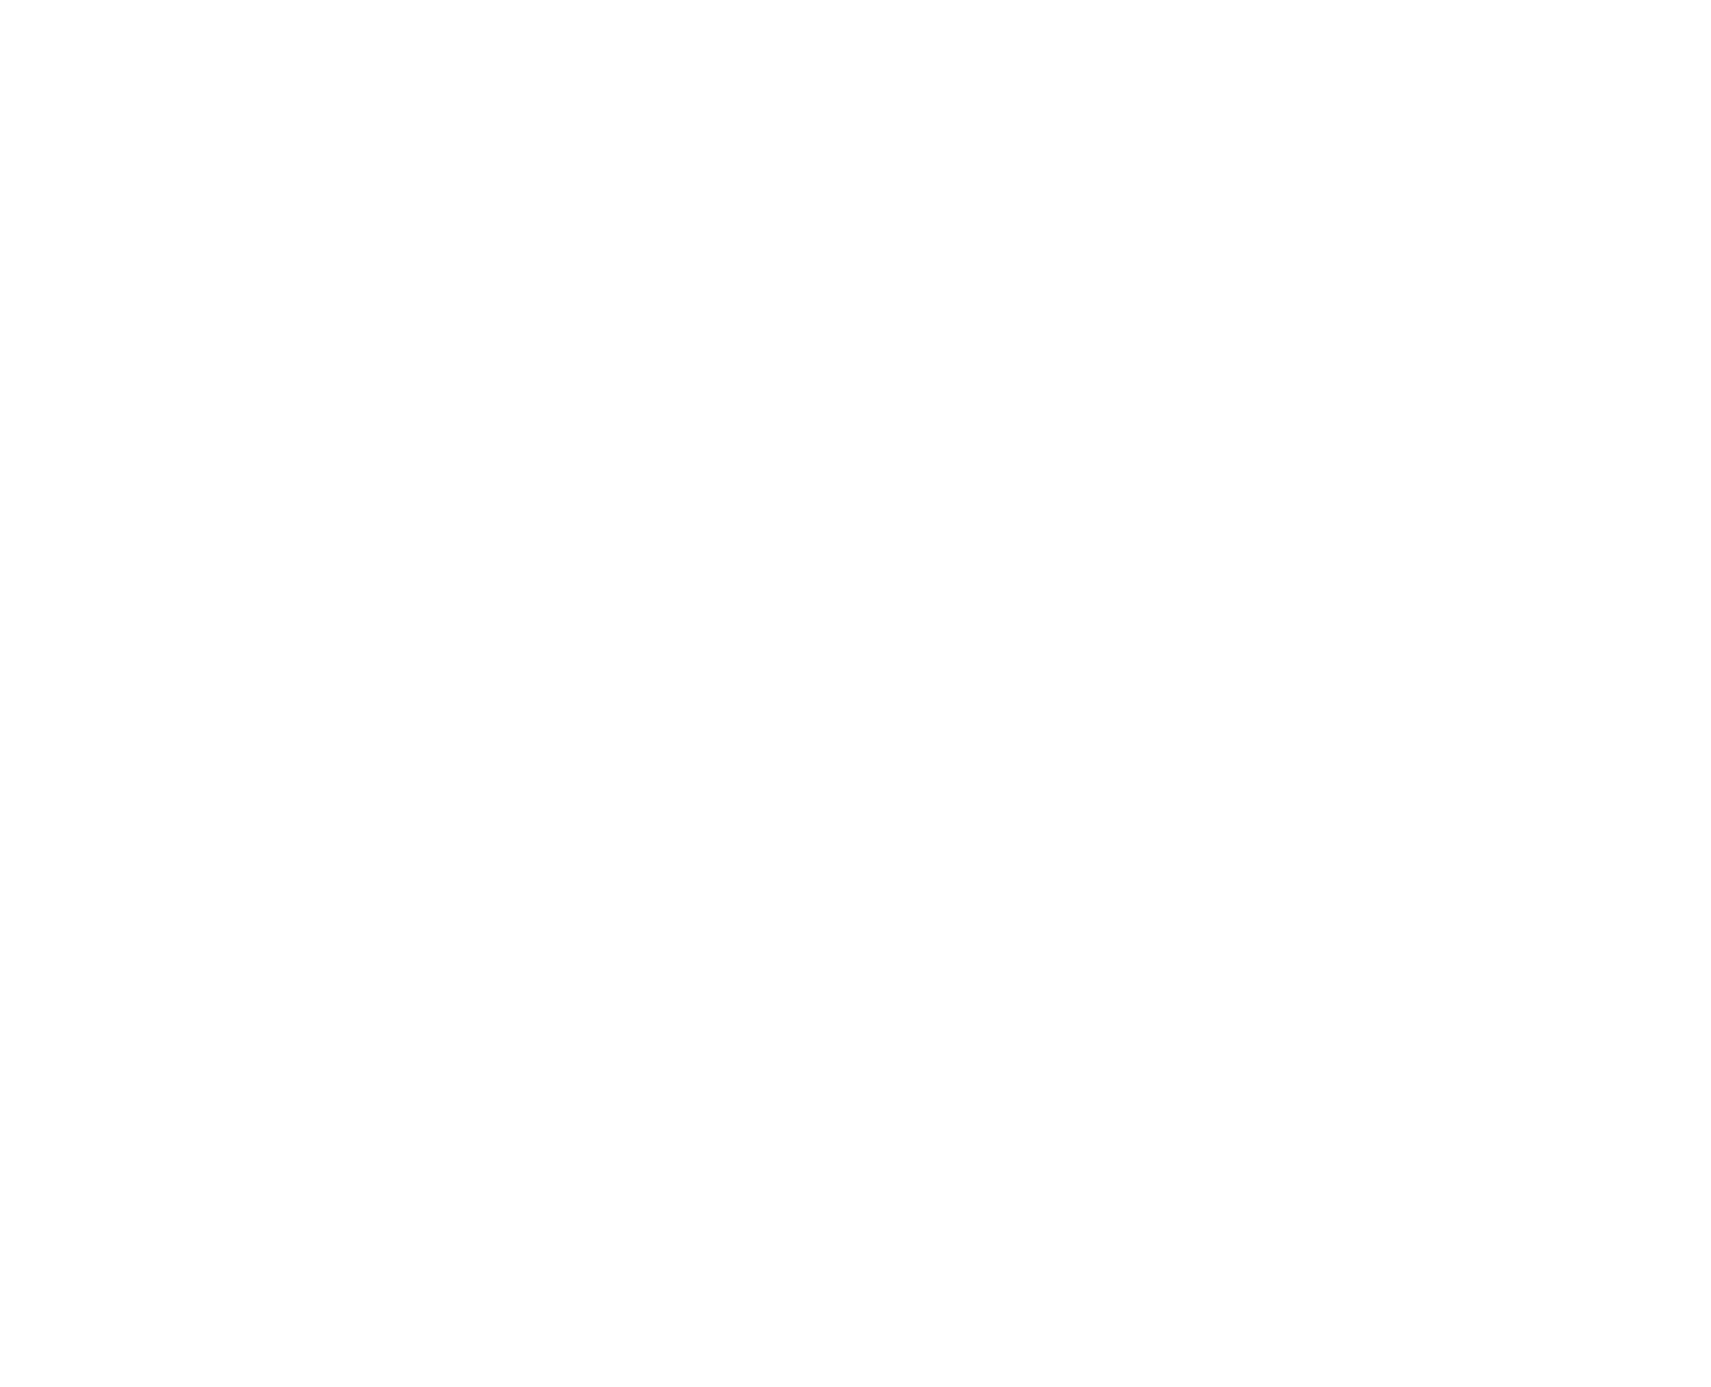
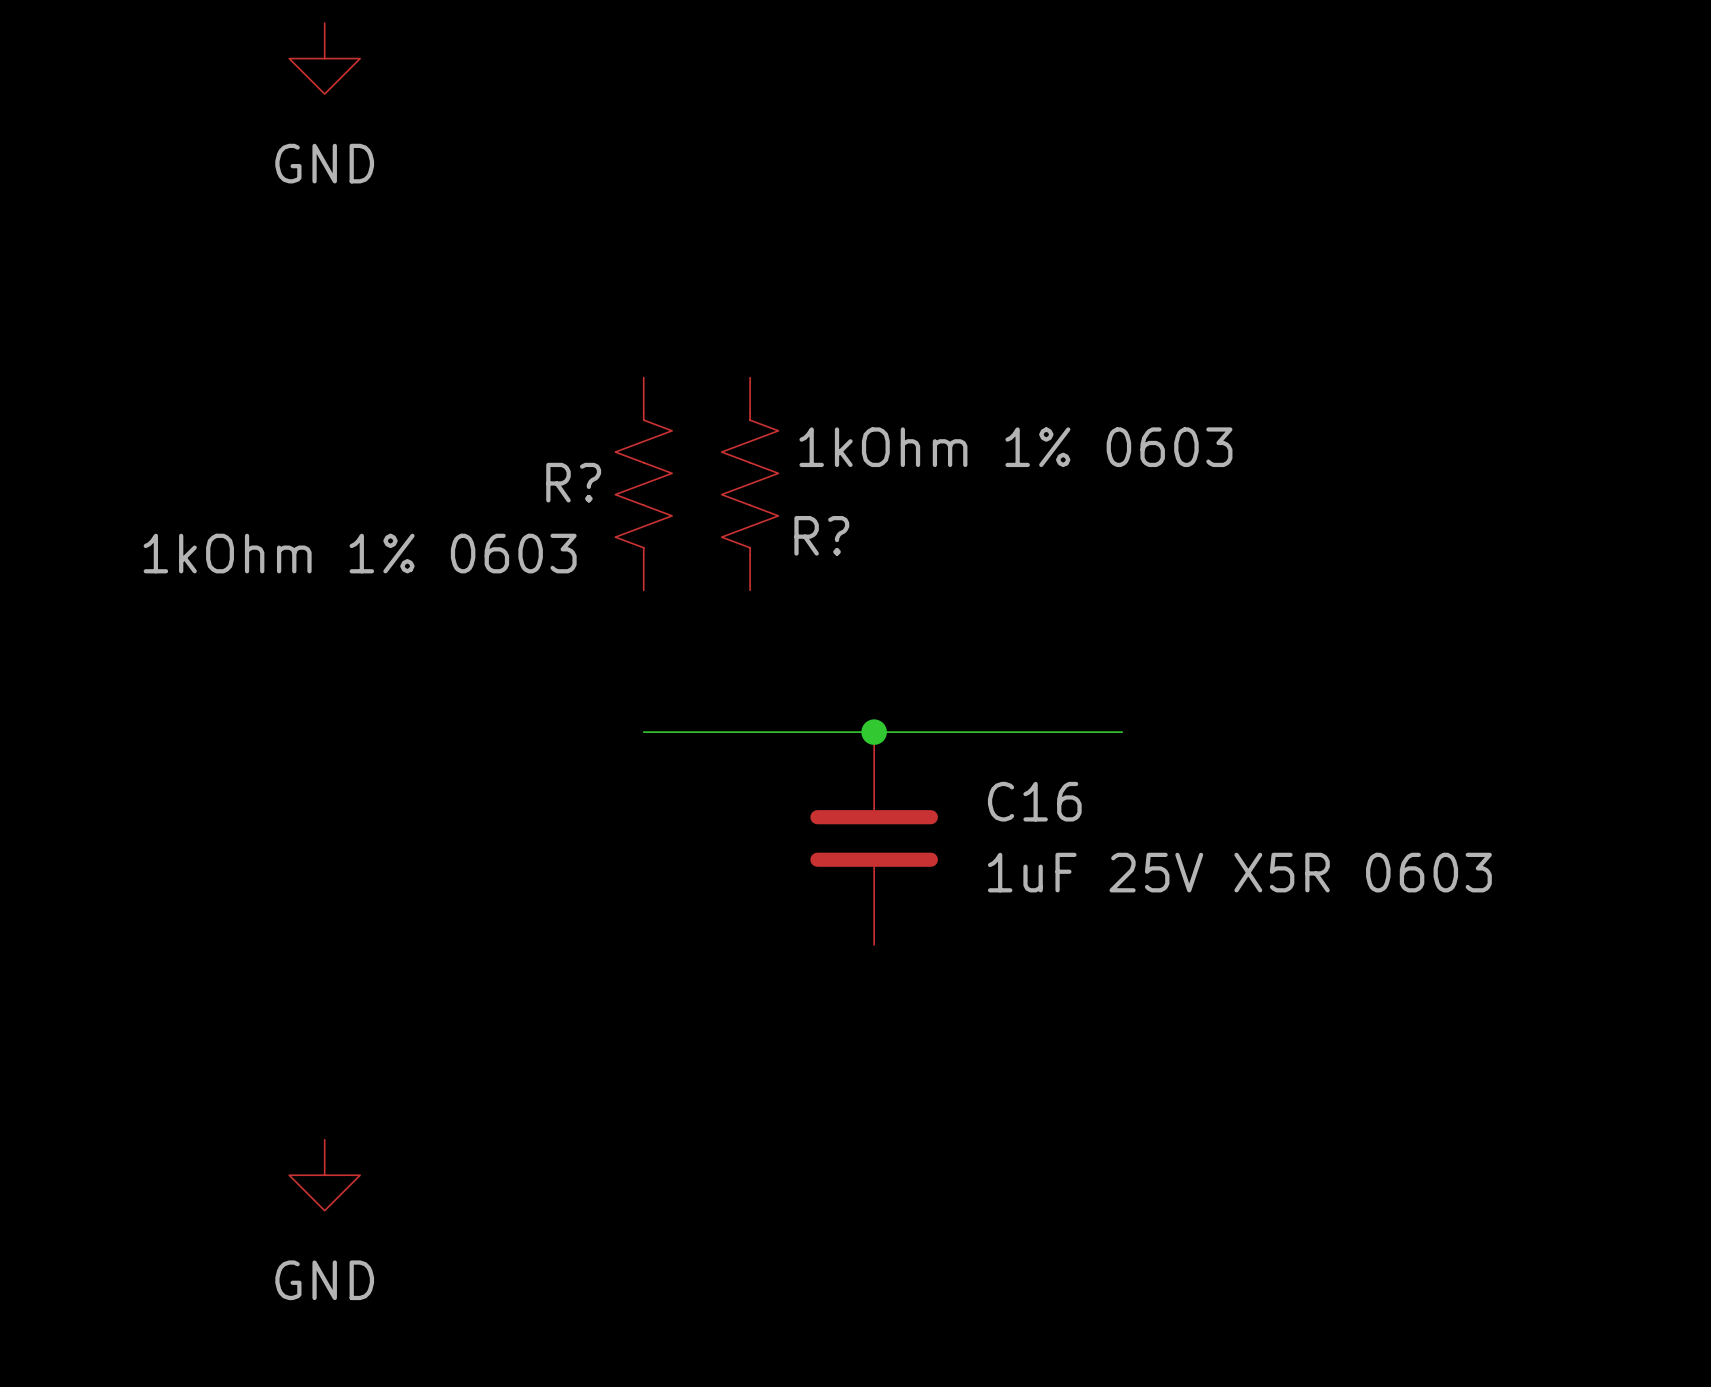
power symbol: none -> GND (324, 58)
R?: none -> 1kOhm 1% 0603 (643, 483)
R?: none -> 1kOhm 1% 0603 (750, 483)
wire: none -> (643, 732) (1122, 732)
junction: none -> (874, 732)
C16: none -> 1uF 25V X5R 0603 (874, 838)
power symbol: none -> GND (324, 1175)

